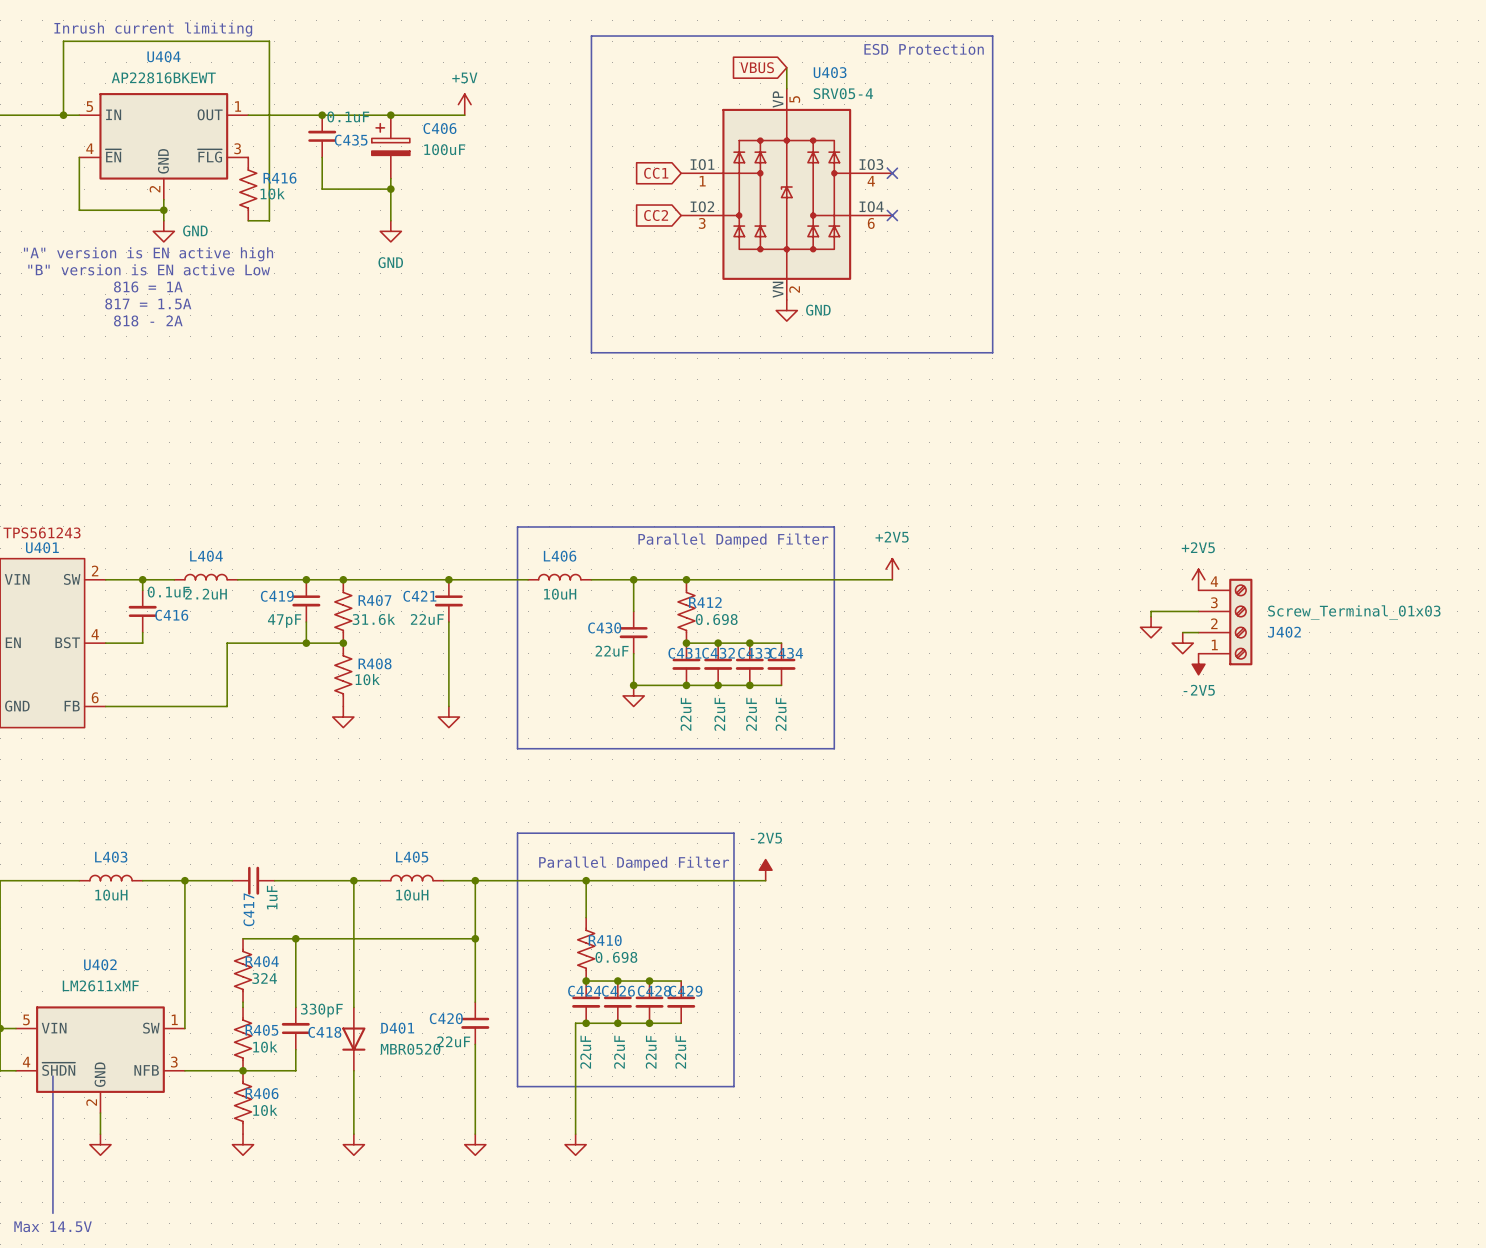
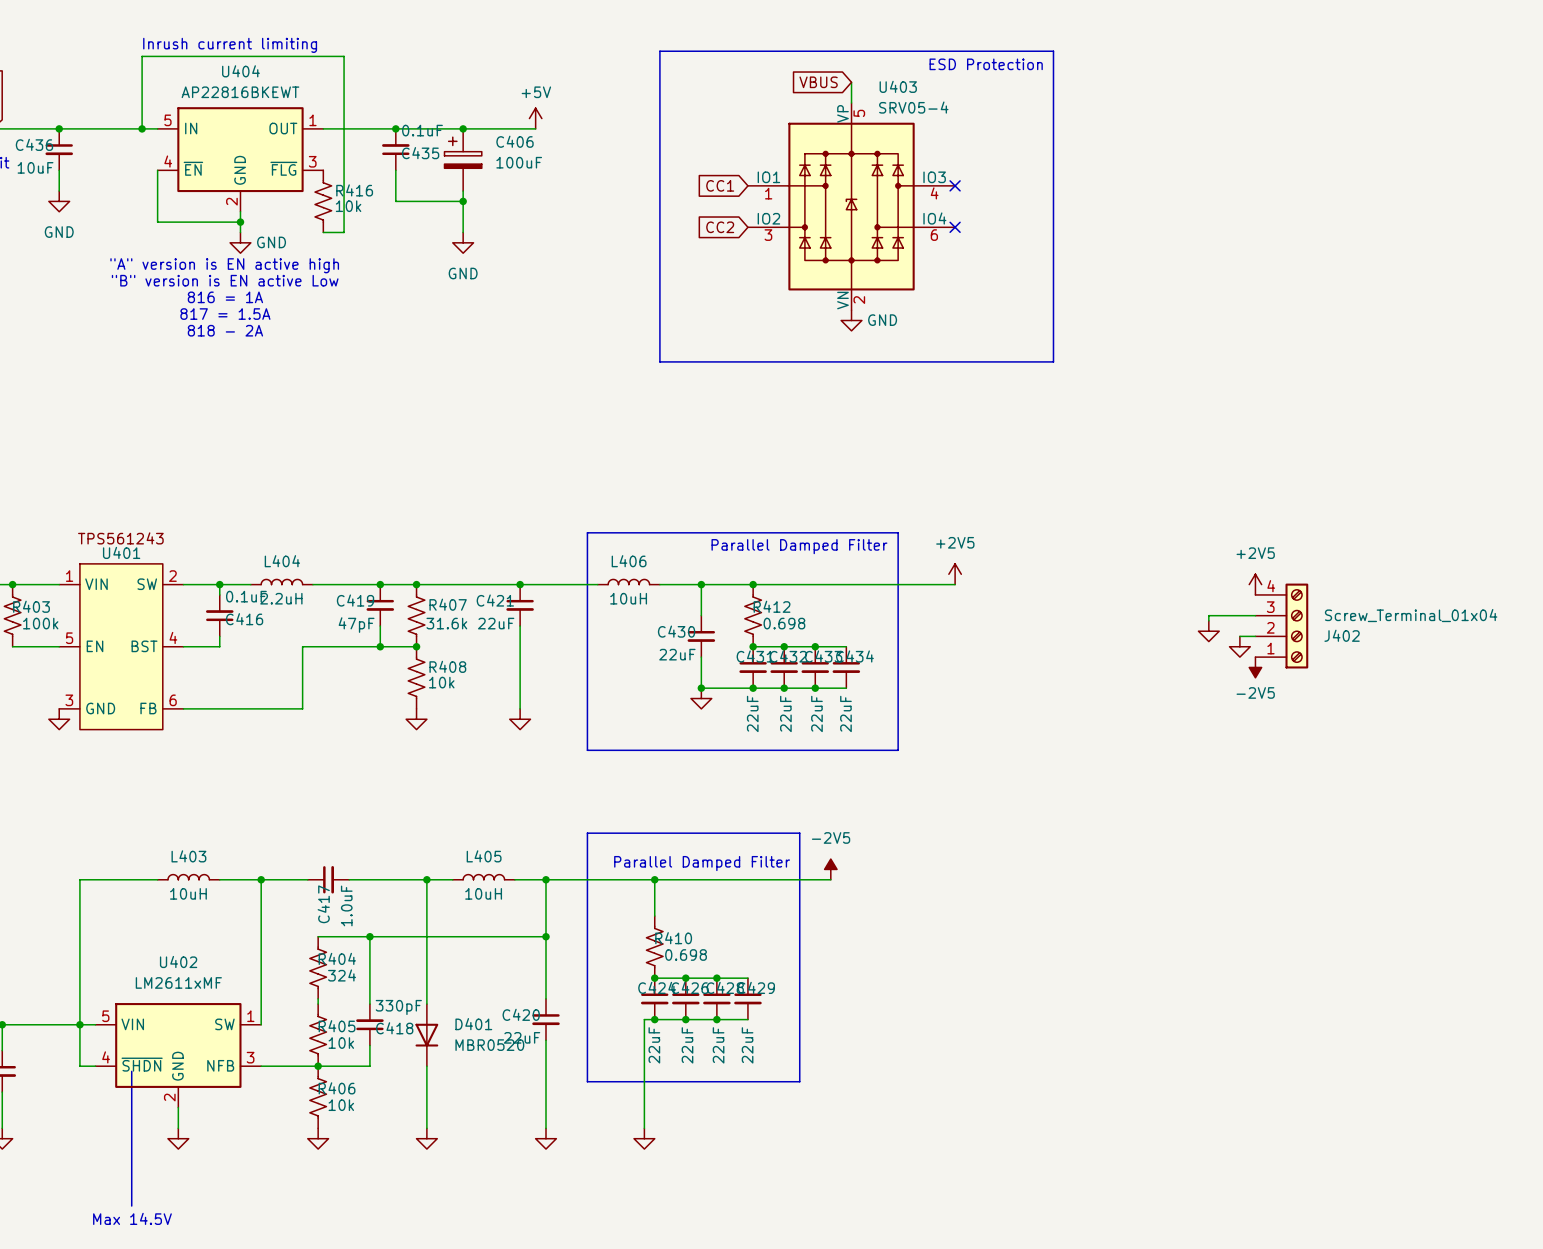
J402 value: Screw_Terminal_01x03 (1354, 612) -> Screw_Terminal_01x04 (1411, 615)
C417 value: 1uF (272, 897) -> 1.0uF (346, 905)

